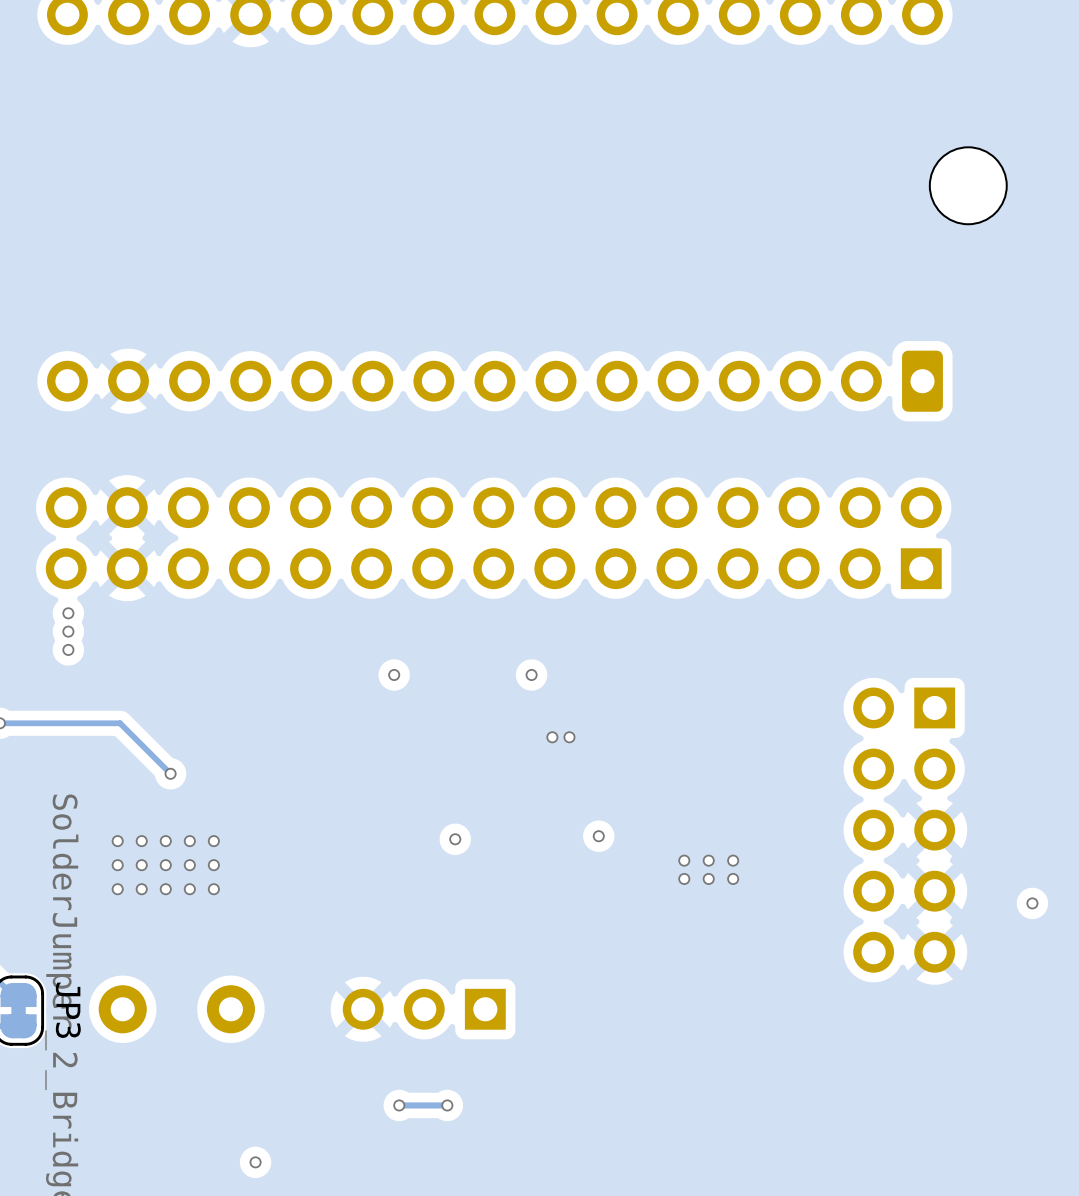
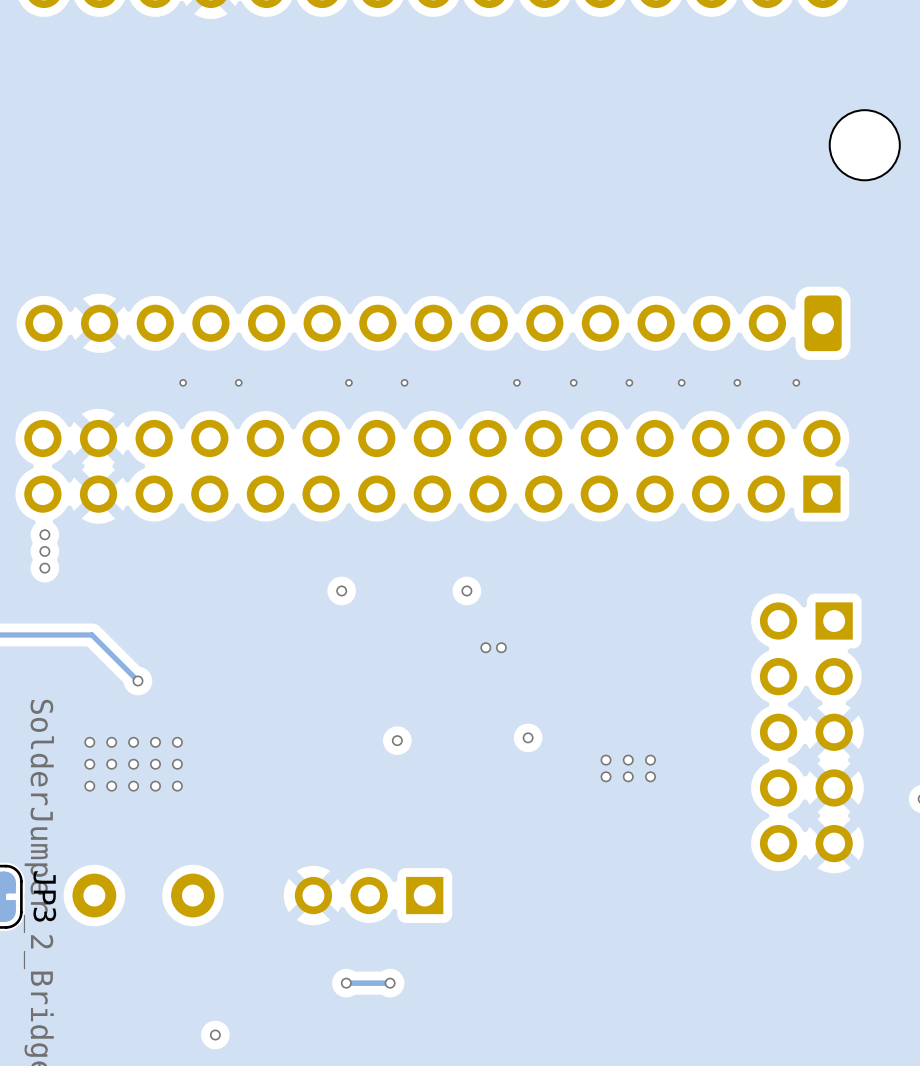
via: none -> (183, 382)
via: none -> (238, 382)
via: none -> (348, 382)
via: none -> (404, 382)
via: none -> (516, 382)
via: none -> (573, 382)
via: none -> (629, 382)
via: none -> (681, 382)
via: none -> (737, 382)
via: none -> (796, 382)

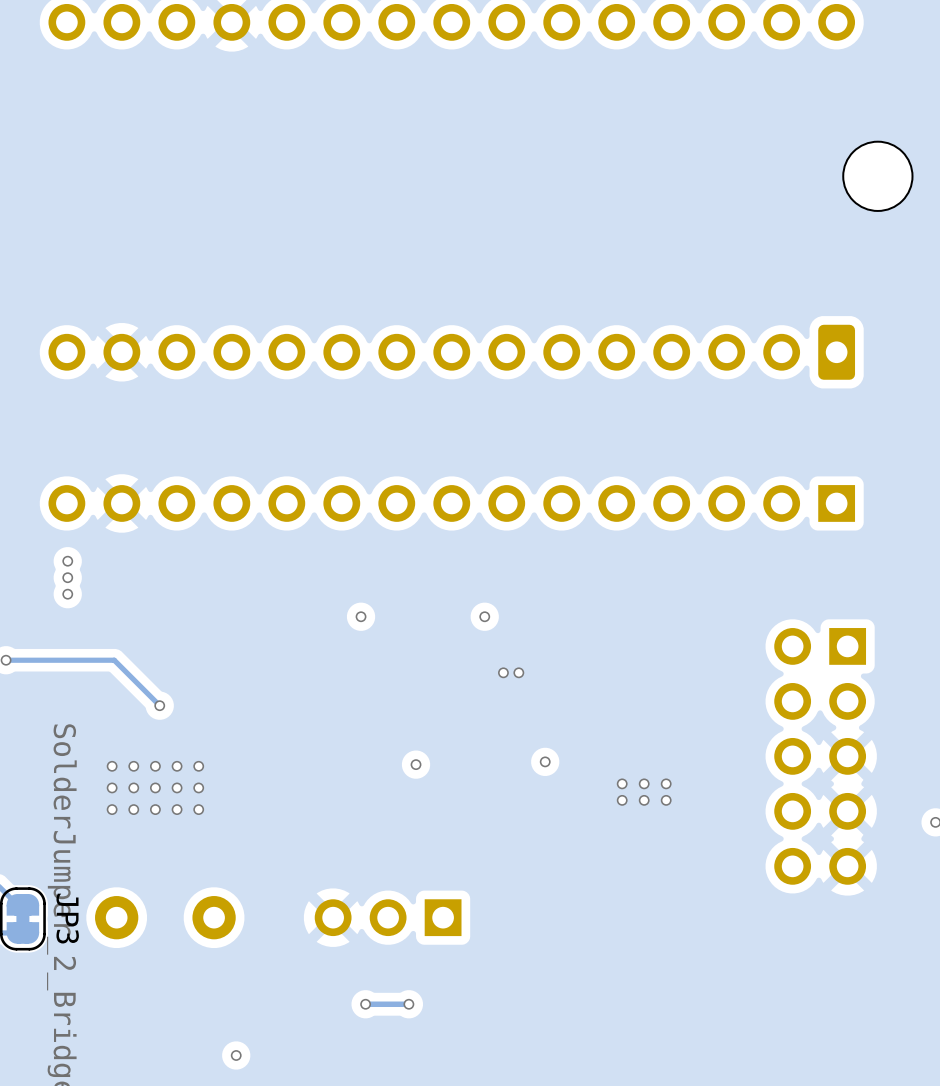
via: (183, 382) -> none
via: (238, 382) -> none
via: (348, 382) -> none
via: (404, 382) -> none
via: (516, 382) -> none
via: (573, 382) -> none
via: (629, 382) -> none
via: (681, 382) -> none
via: (737, 382) -> none
via: (796, 382) -> none
part footprint: [24, 419, 841, 513] -> [48, 485, 856, 522]

